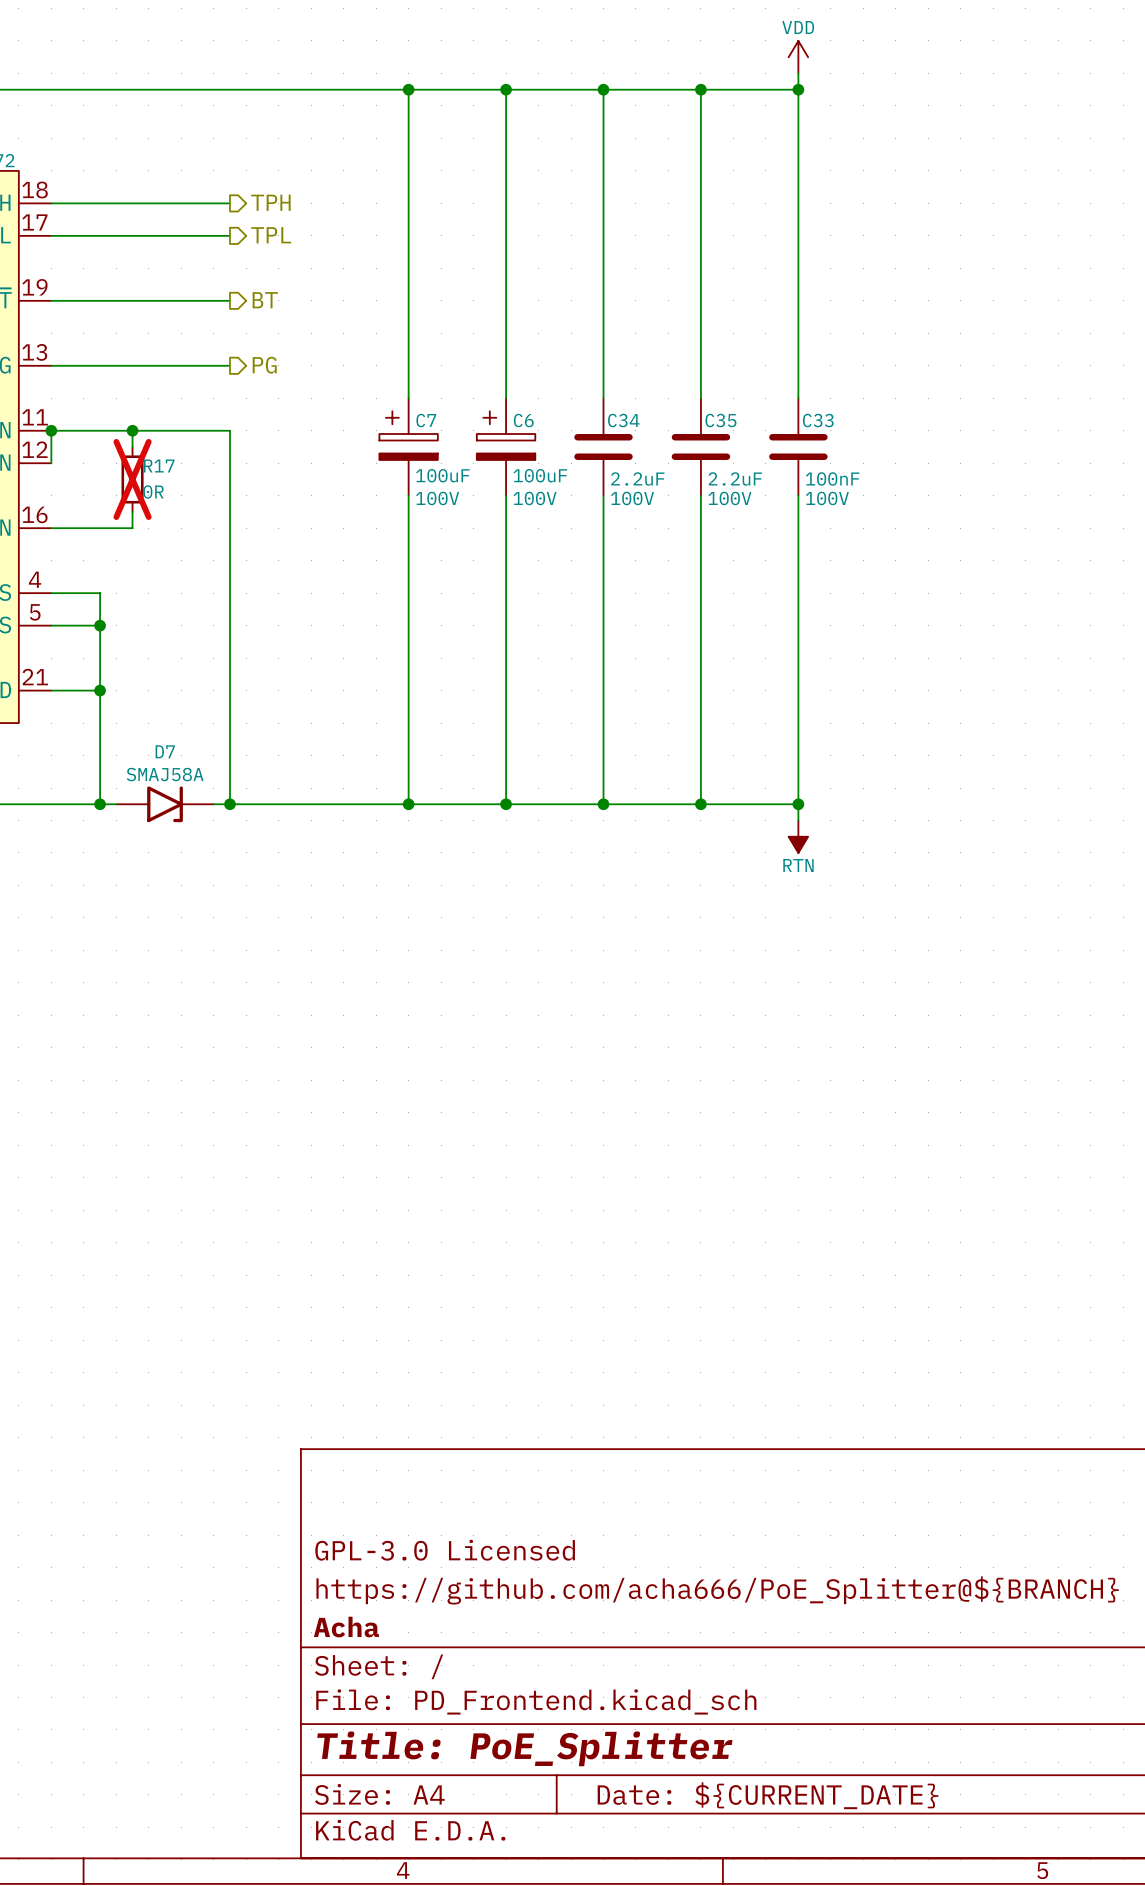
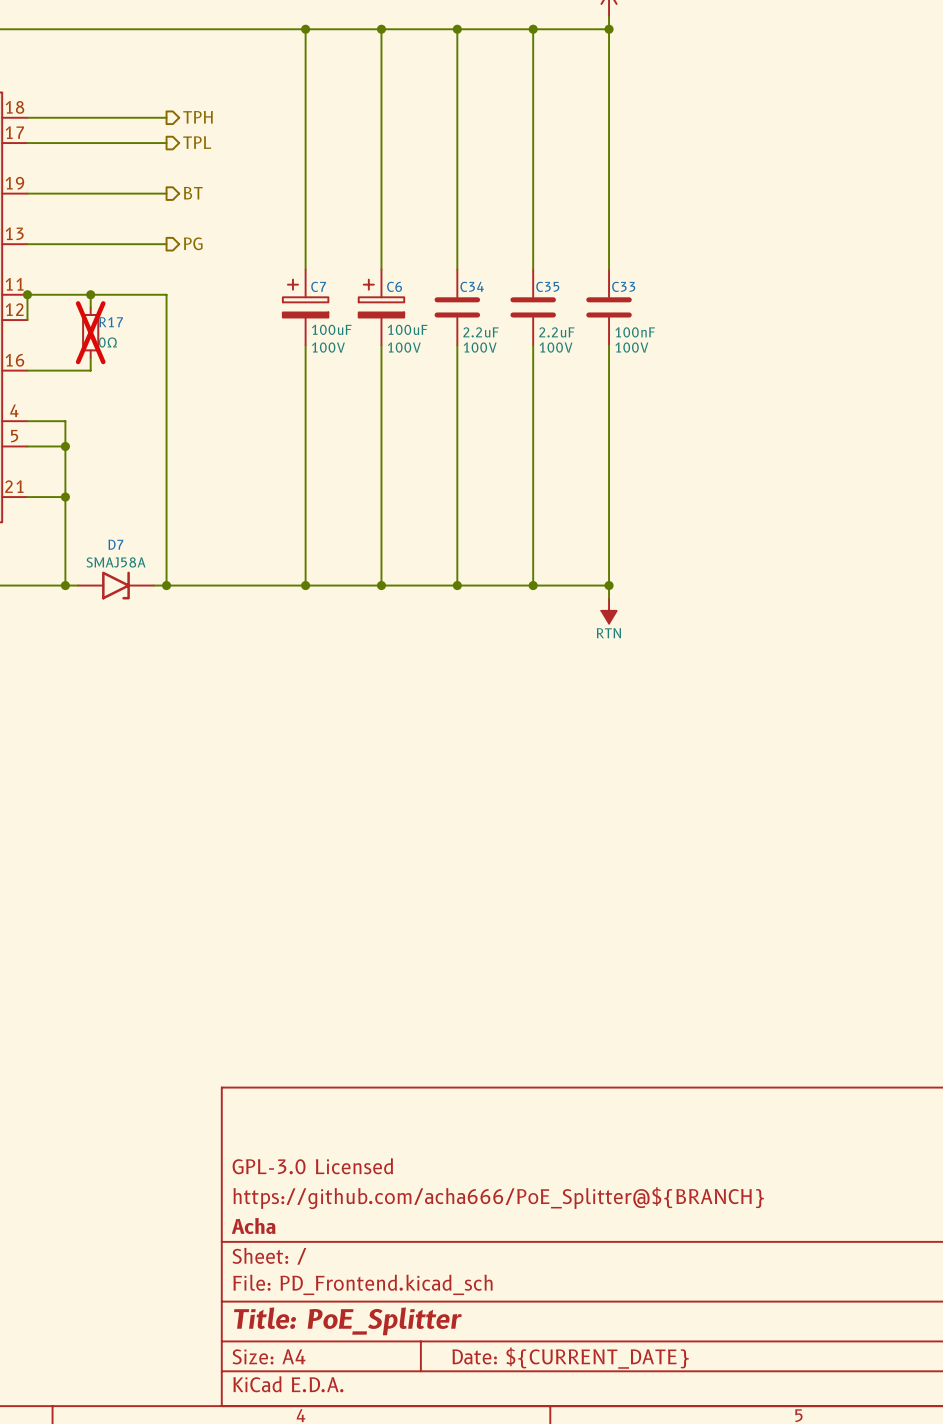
R17 value: 0R (153, 491) -> 0Ω (107, 342)

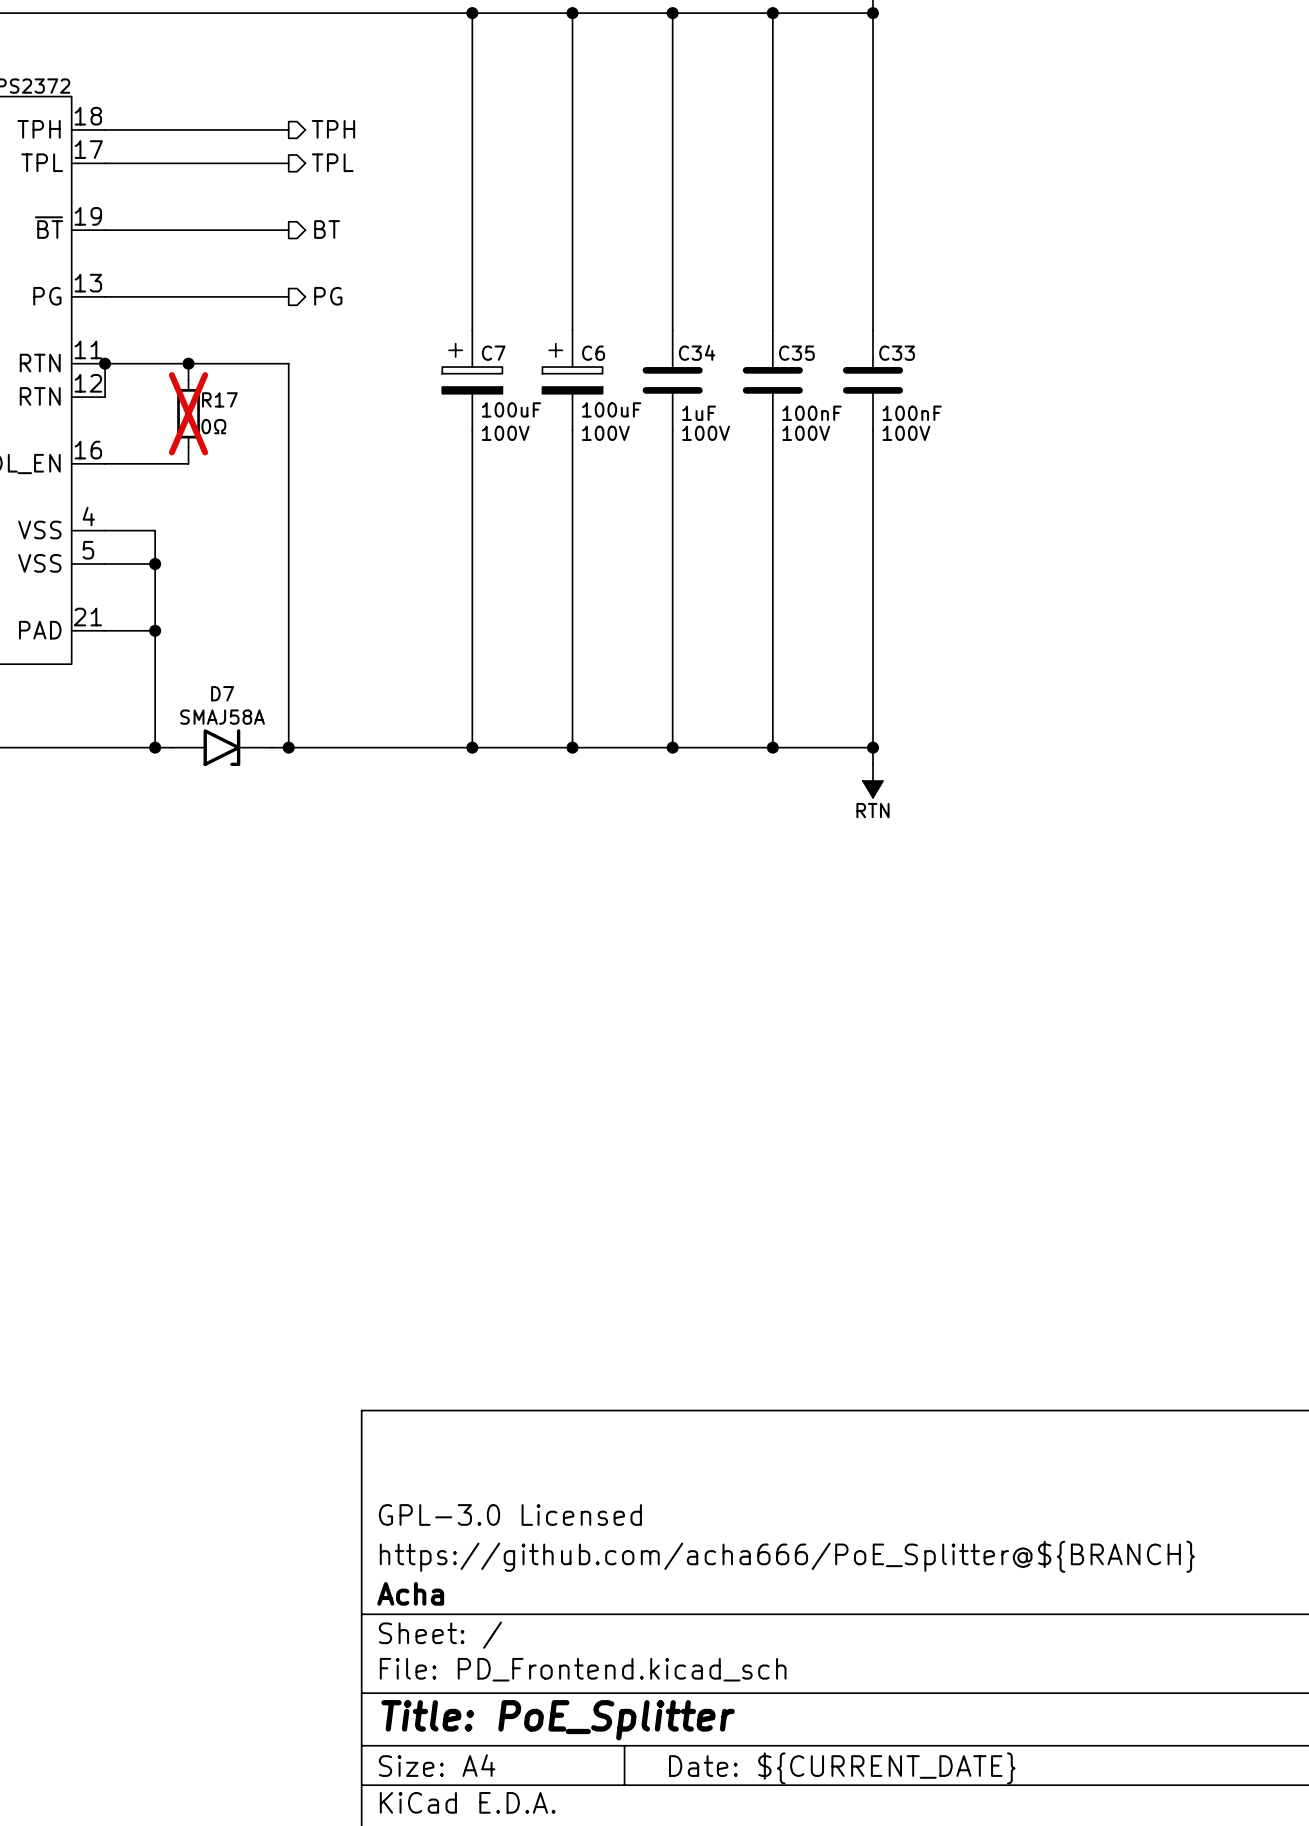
C34 value: 2.2uF (481, 332) -> 1uF (699, 413)
C35 value: 2.2uF (556, 332) -> 100nF (811, 413)

